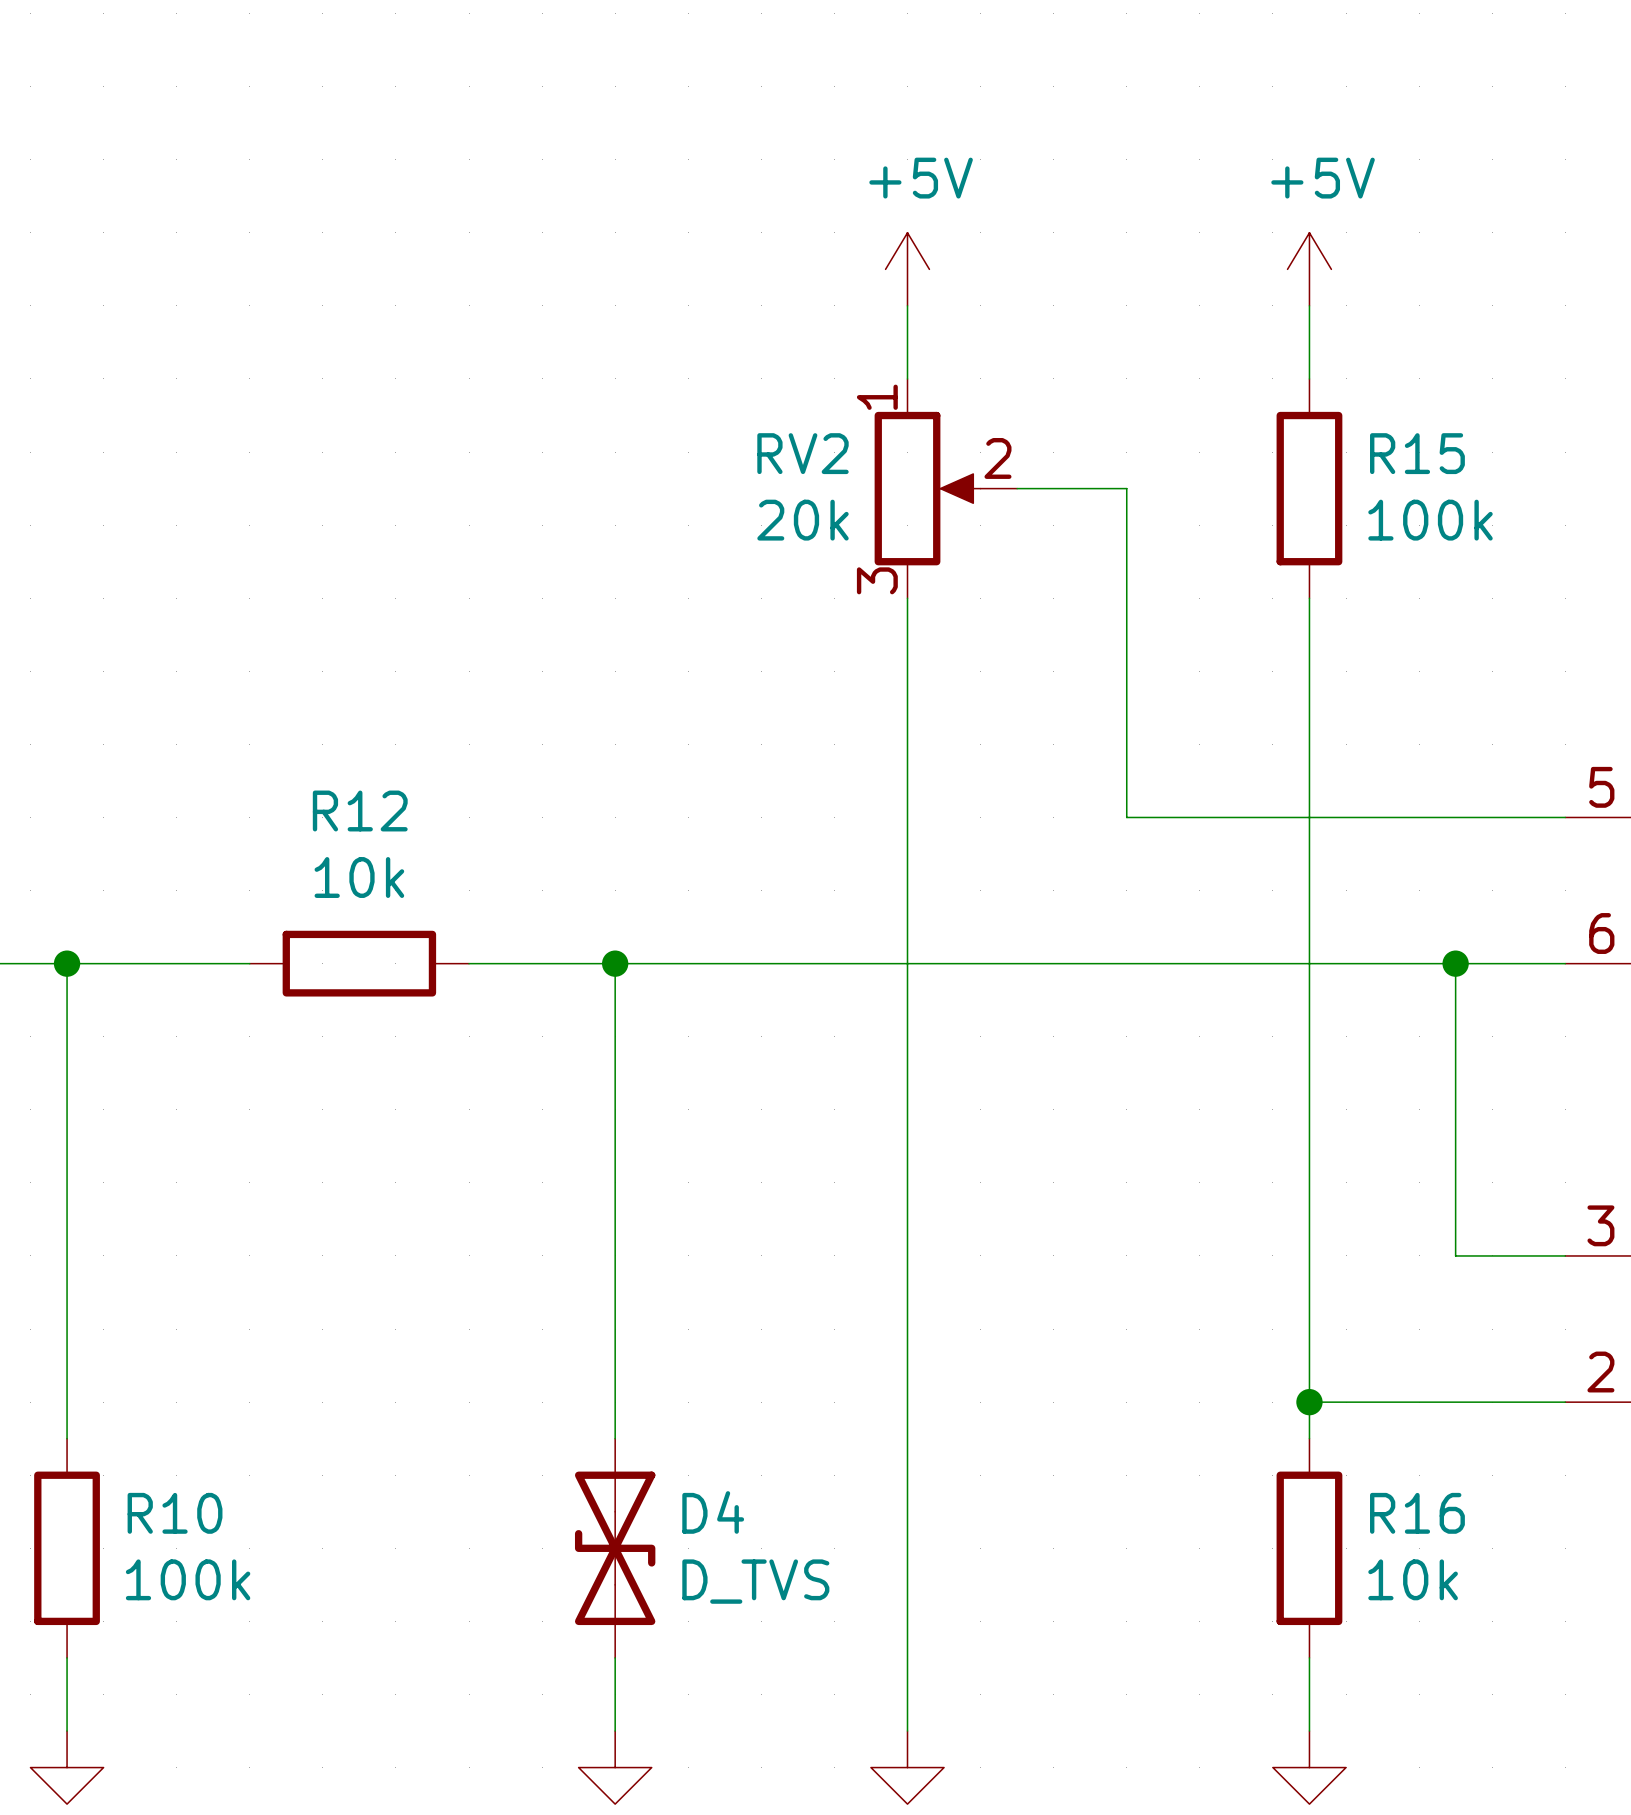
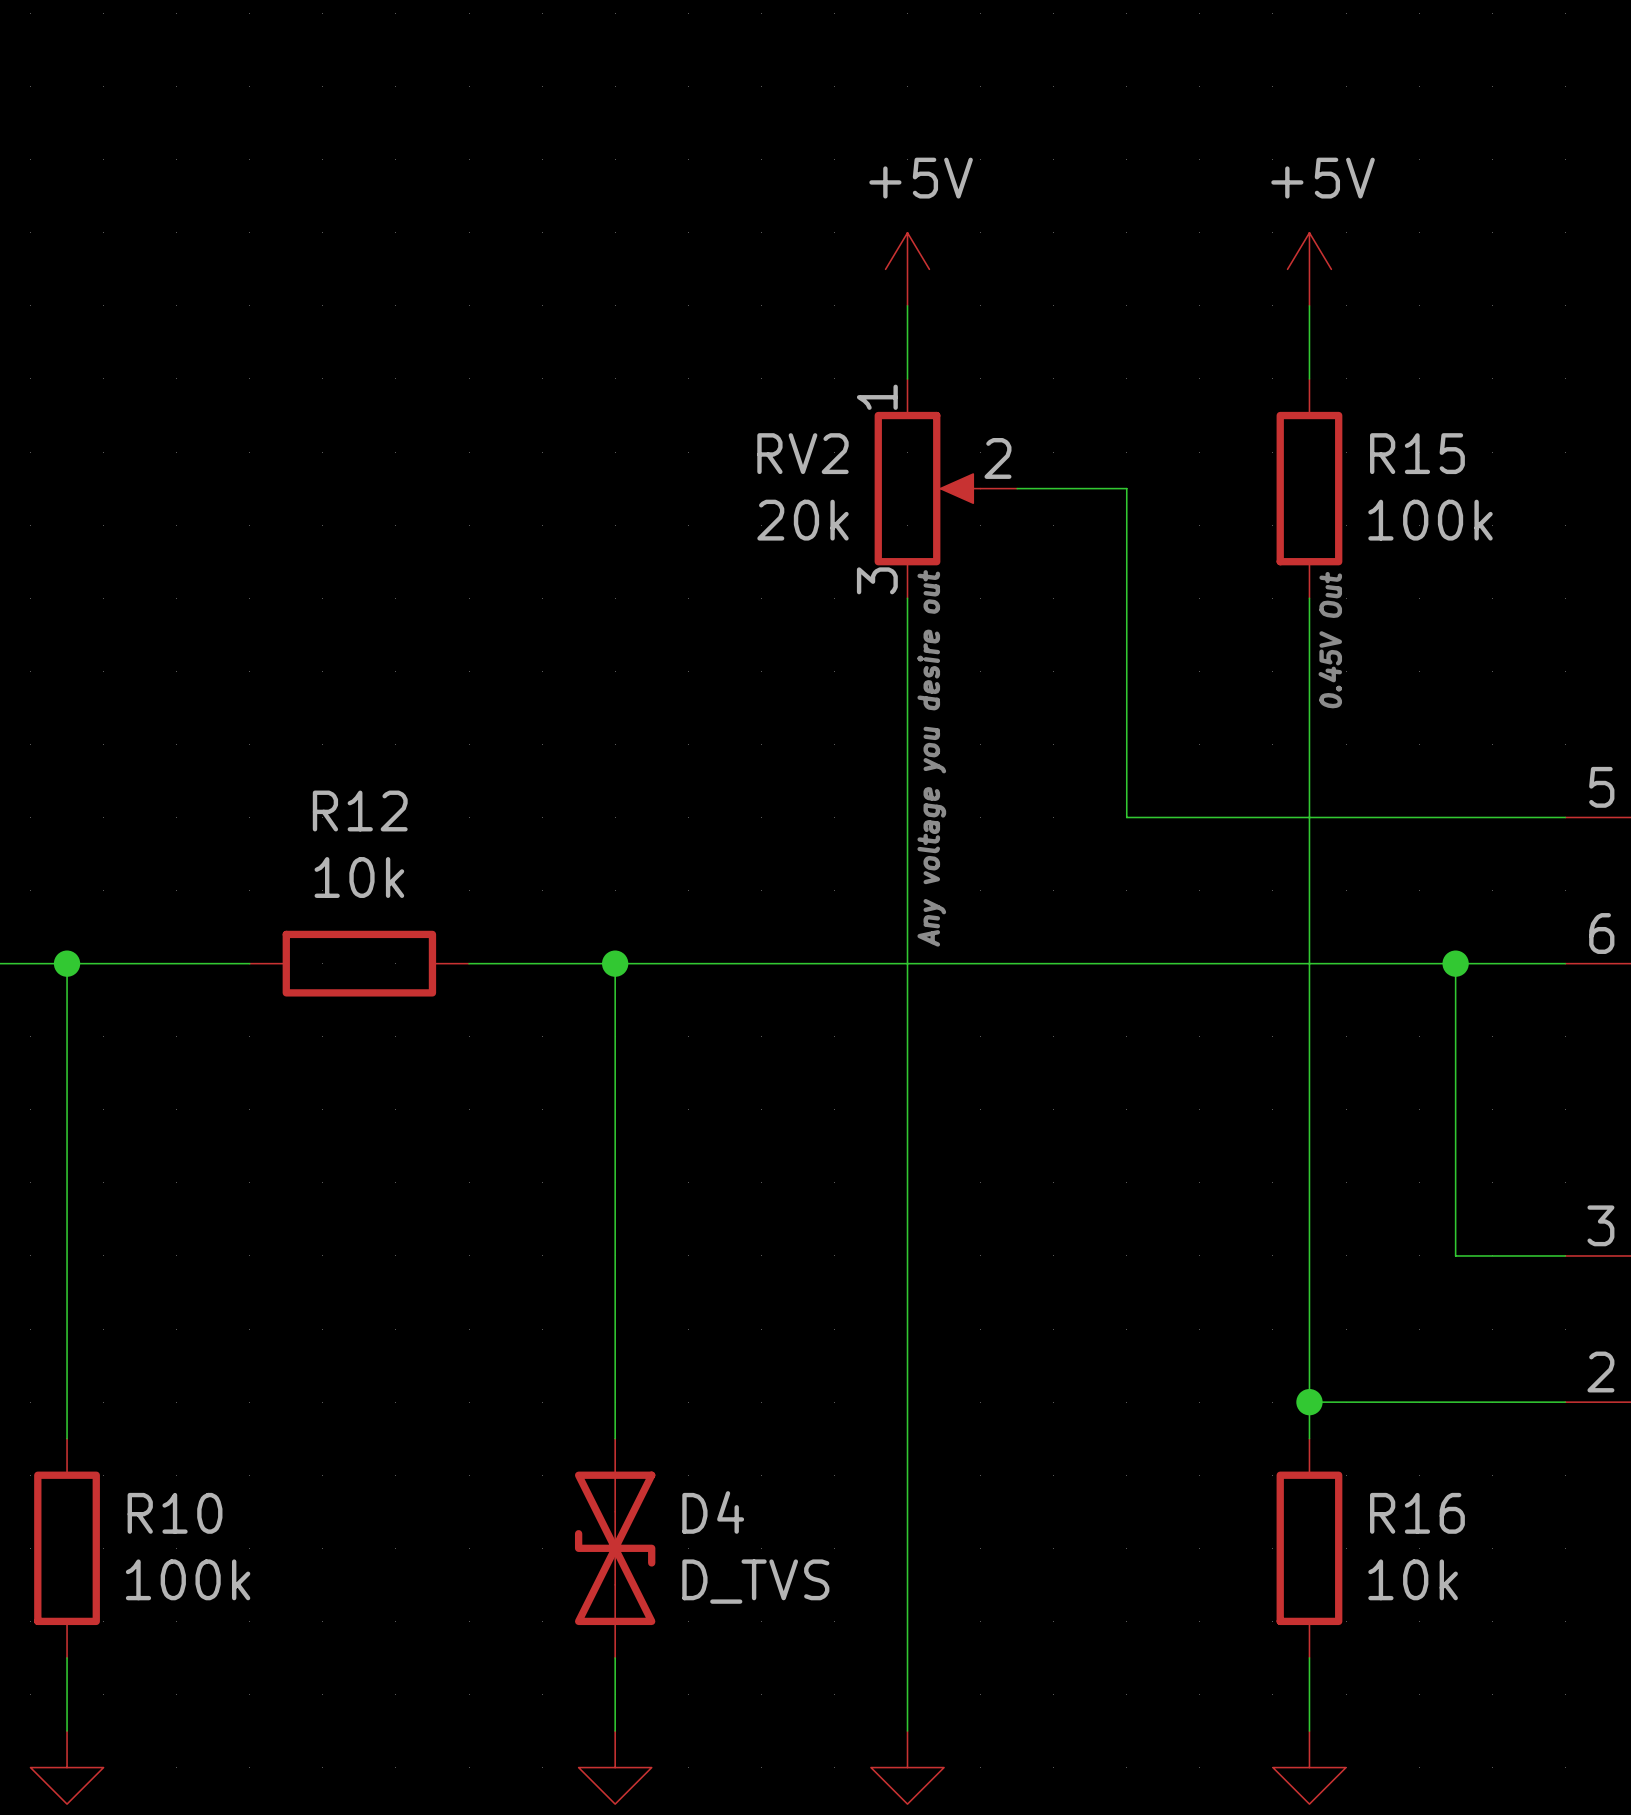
text: none -> 0.45V Out (1330, 640)
text: none -> Any voltage you desire out (931, 758)

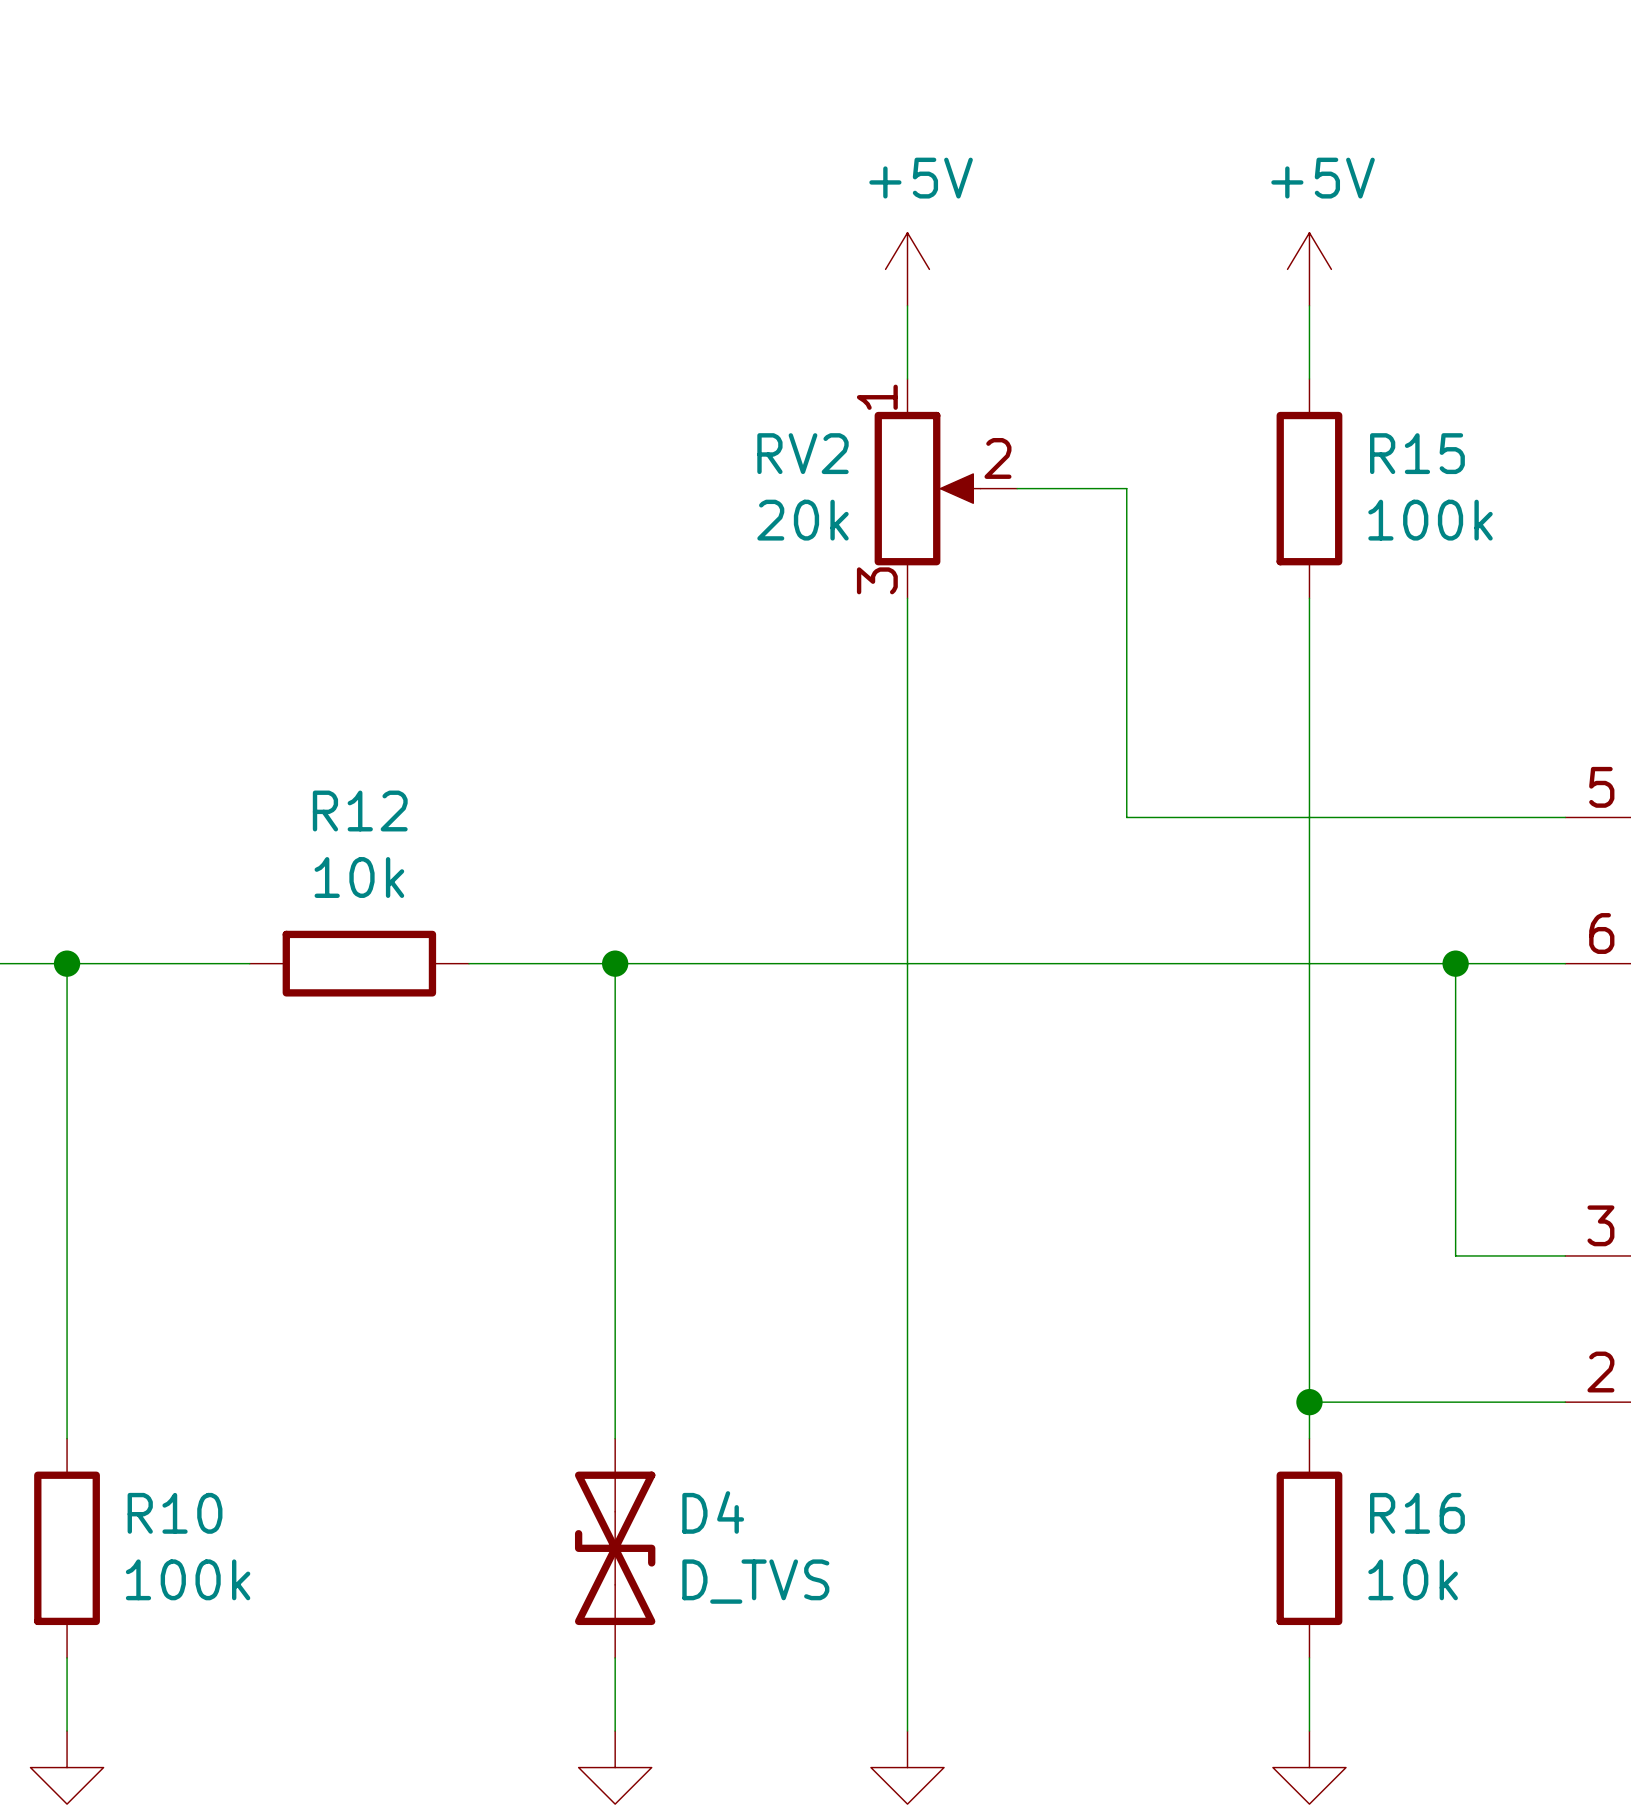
text: 0.45V Out (1330, 640) -> none
text: Any voltage you desire out (931, 758) -> none

